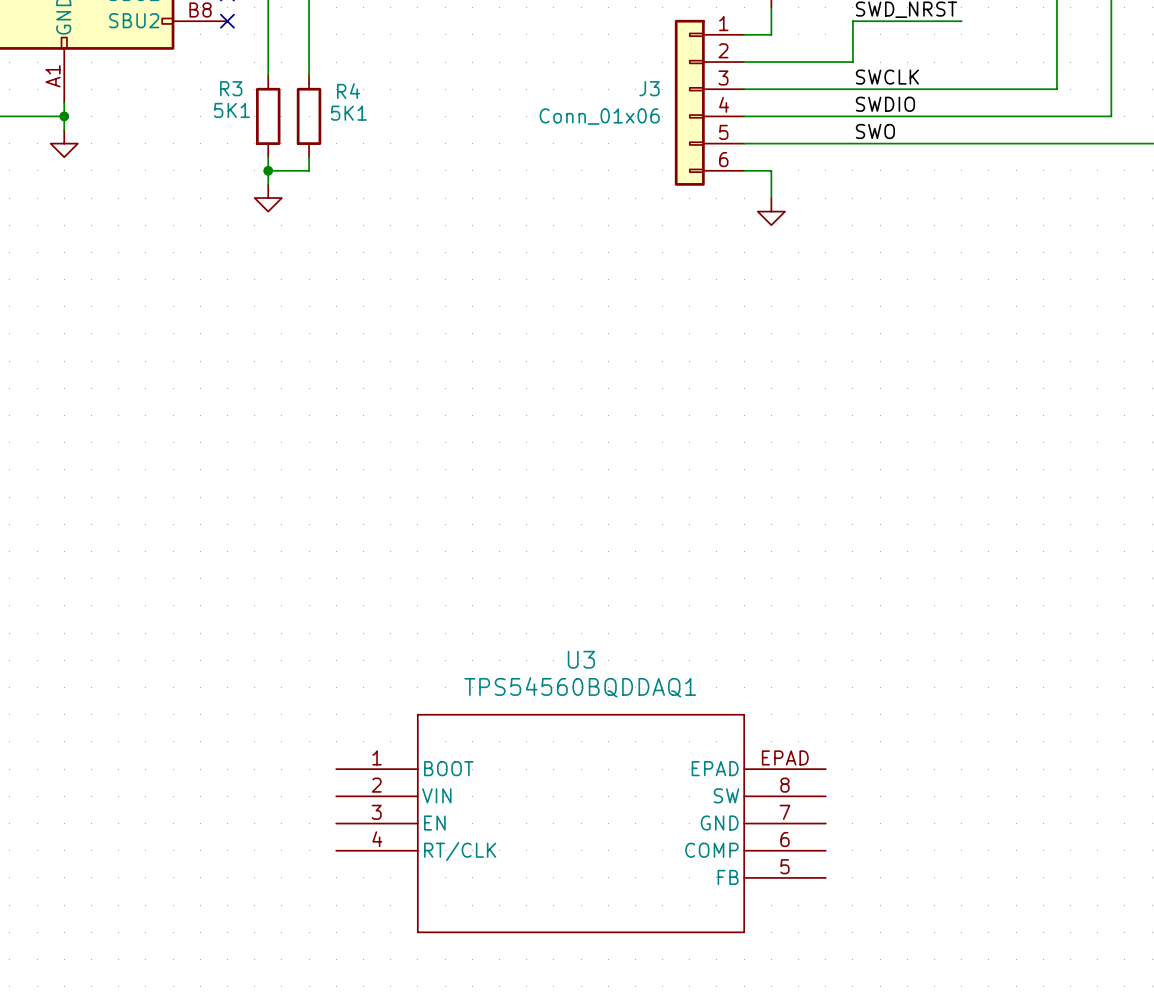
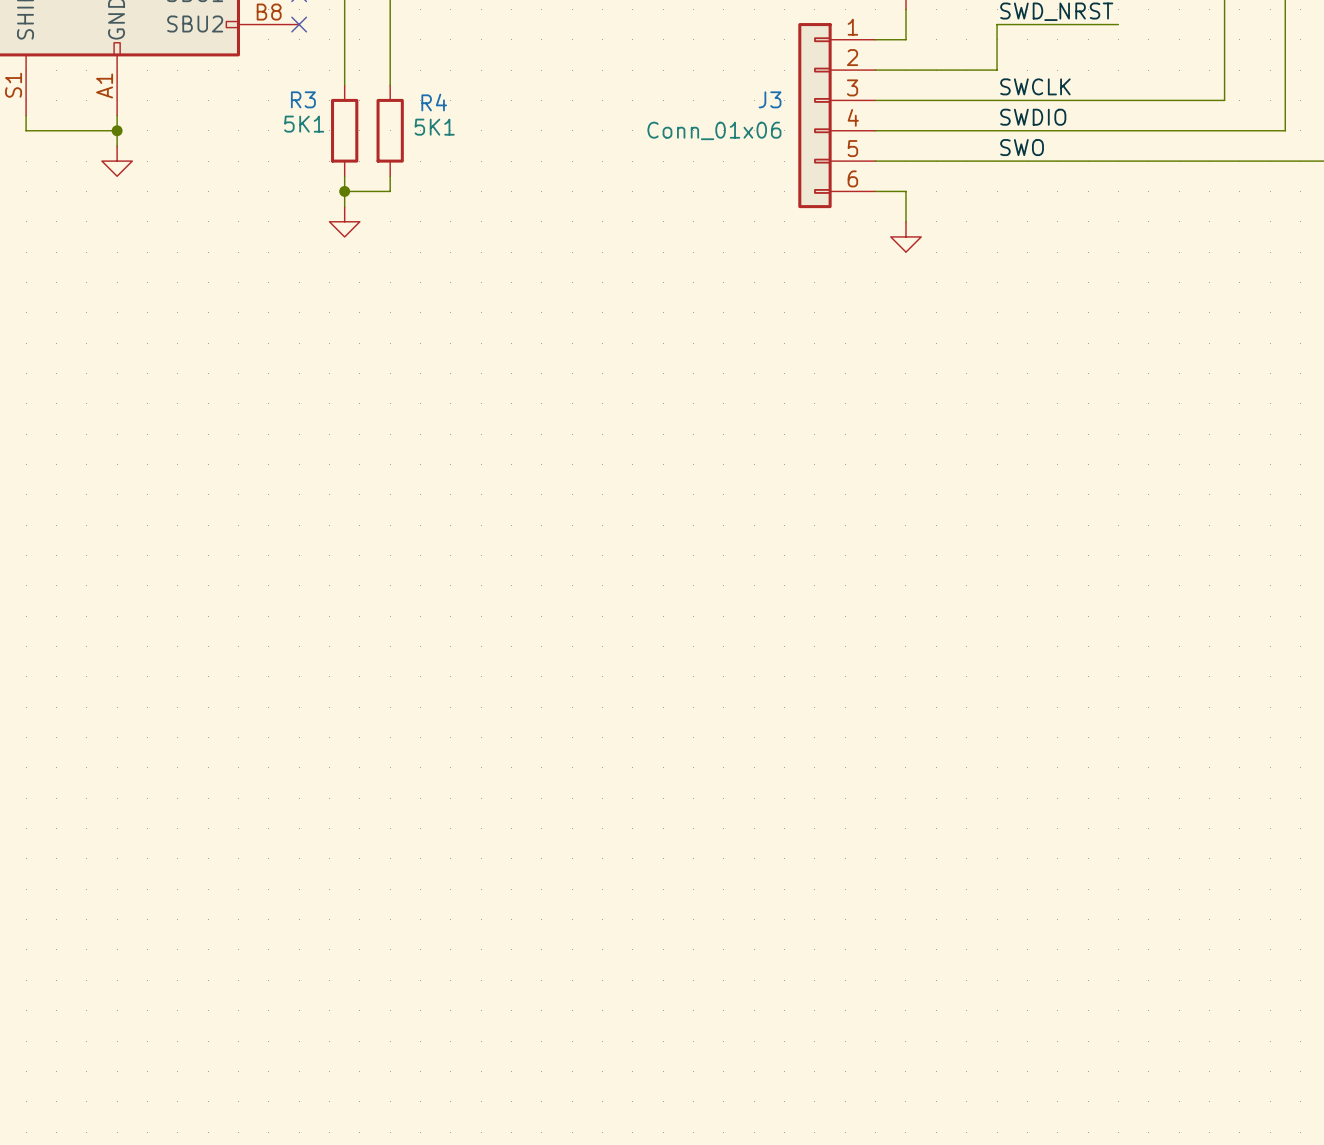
U3: TPS54560BQDDAQ1 (581, 823) -> none

